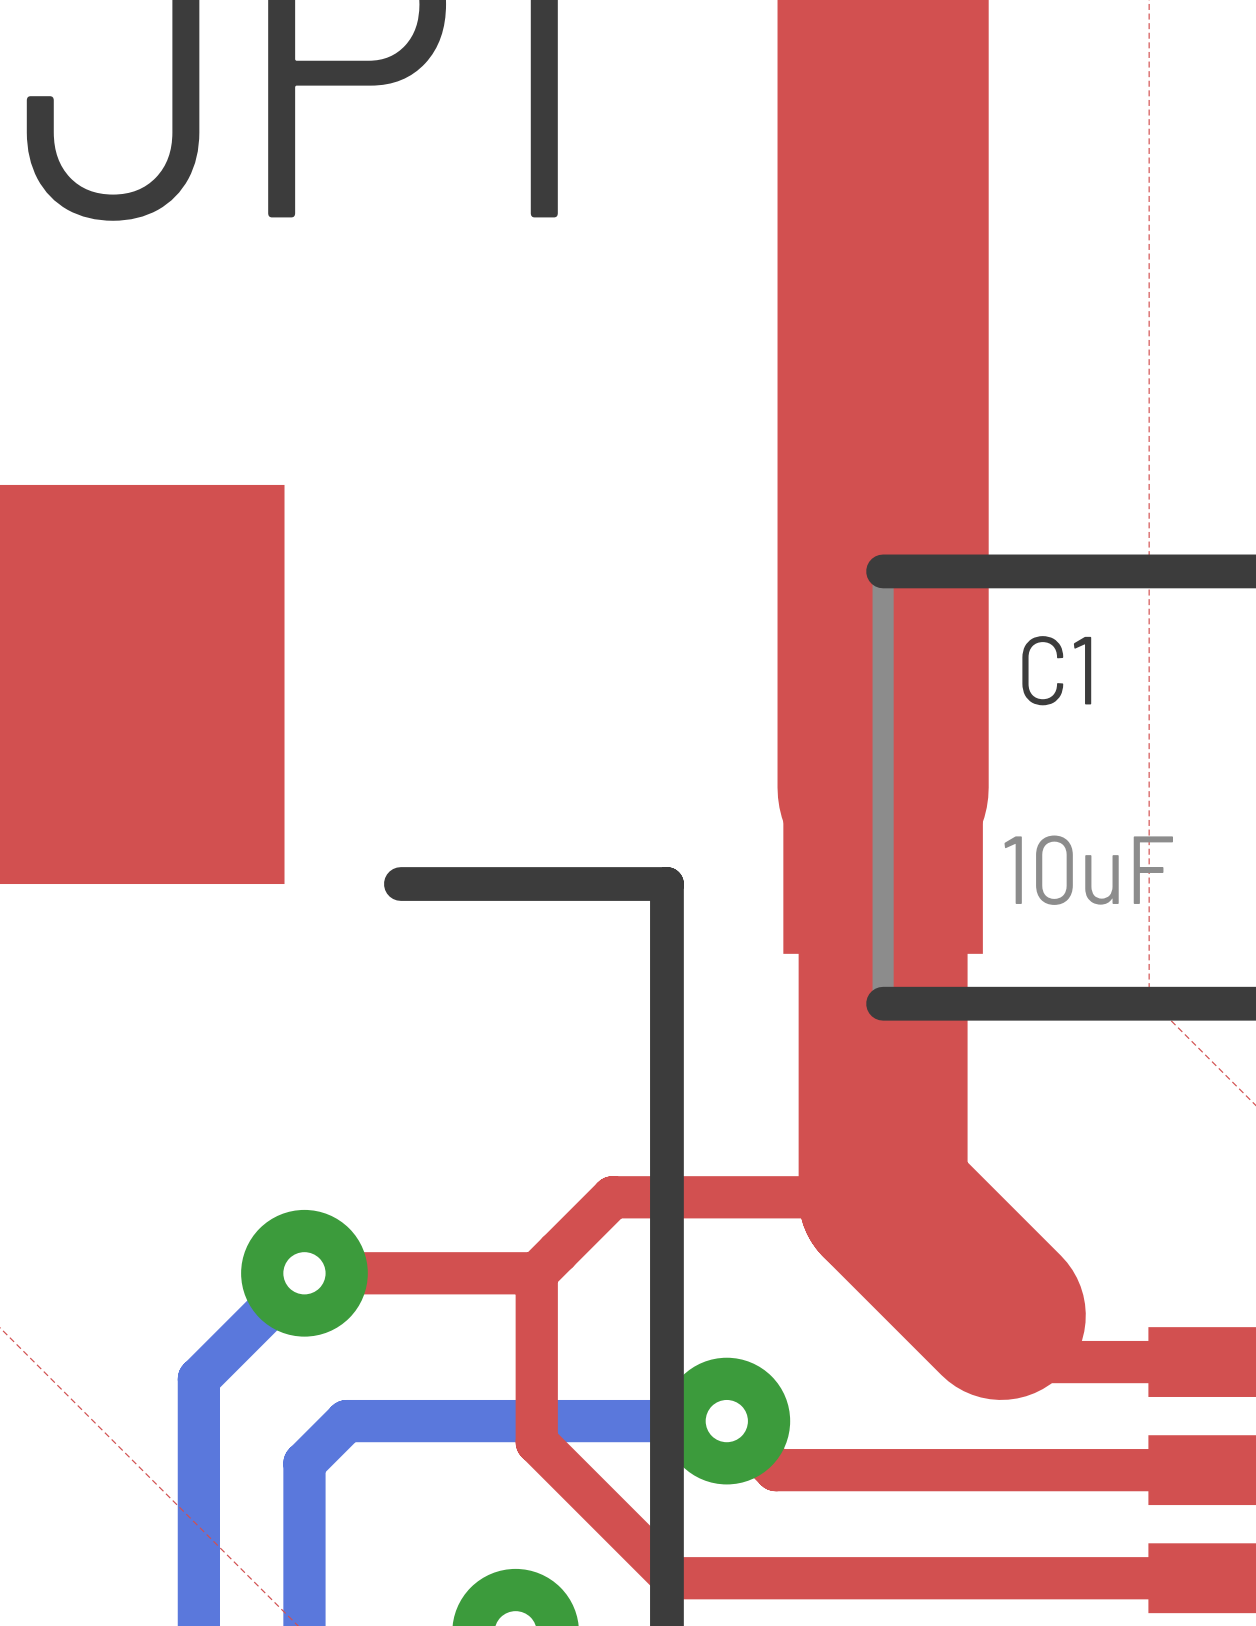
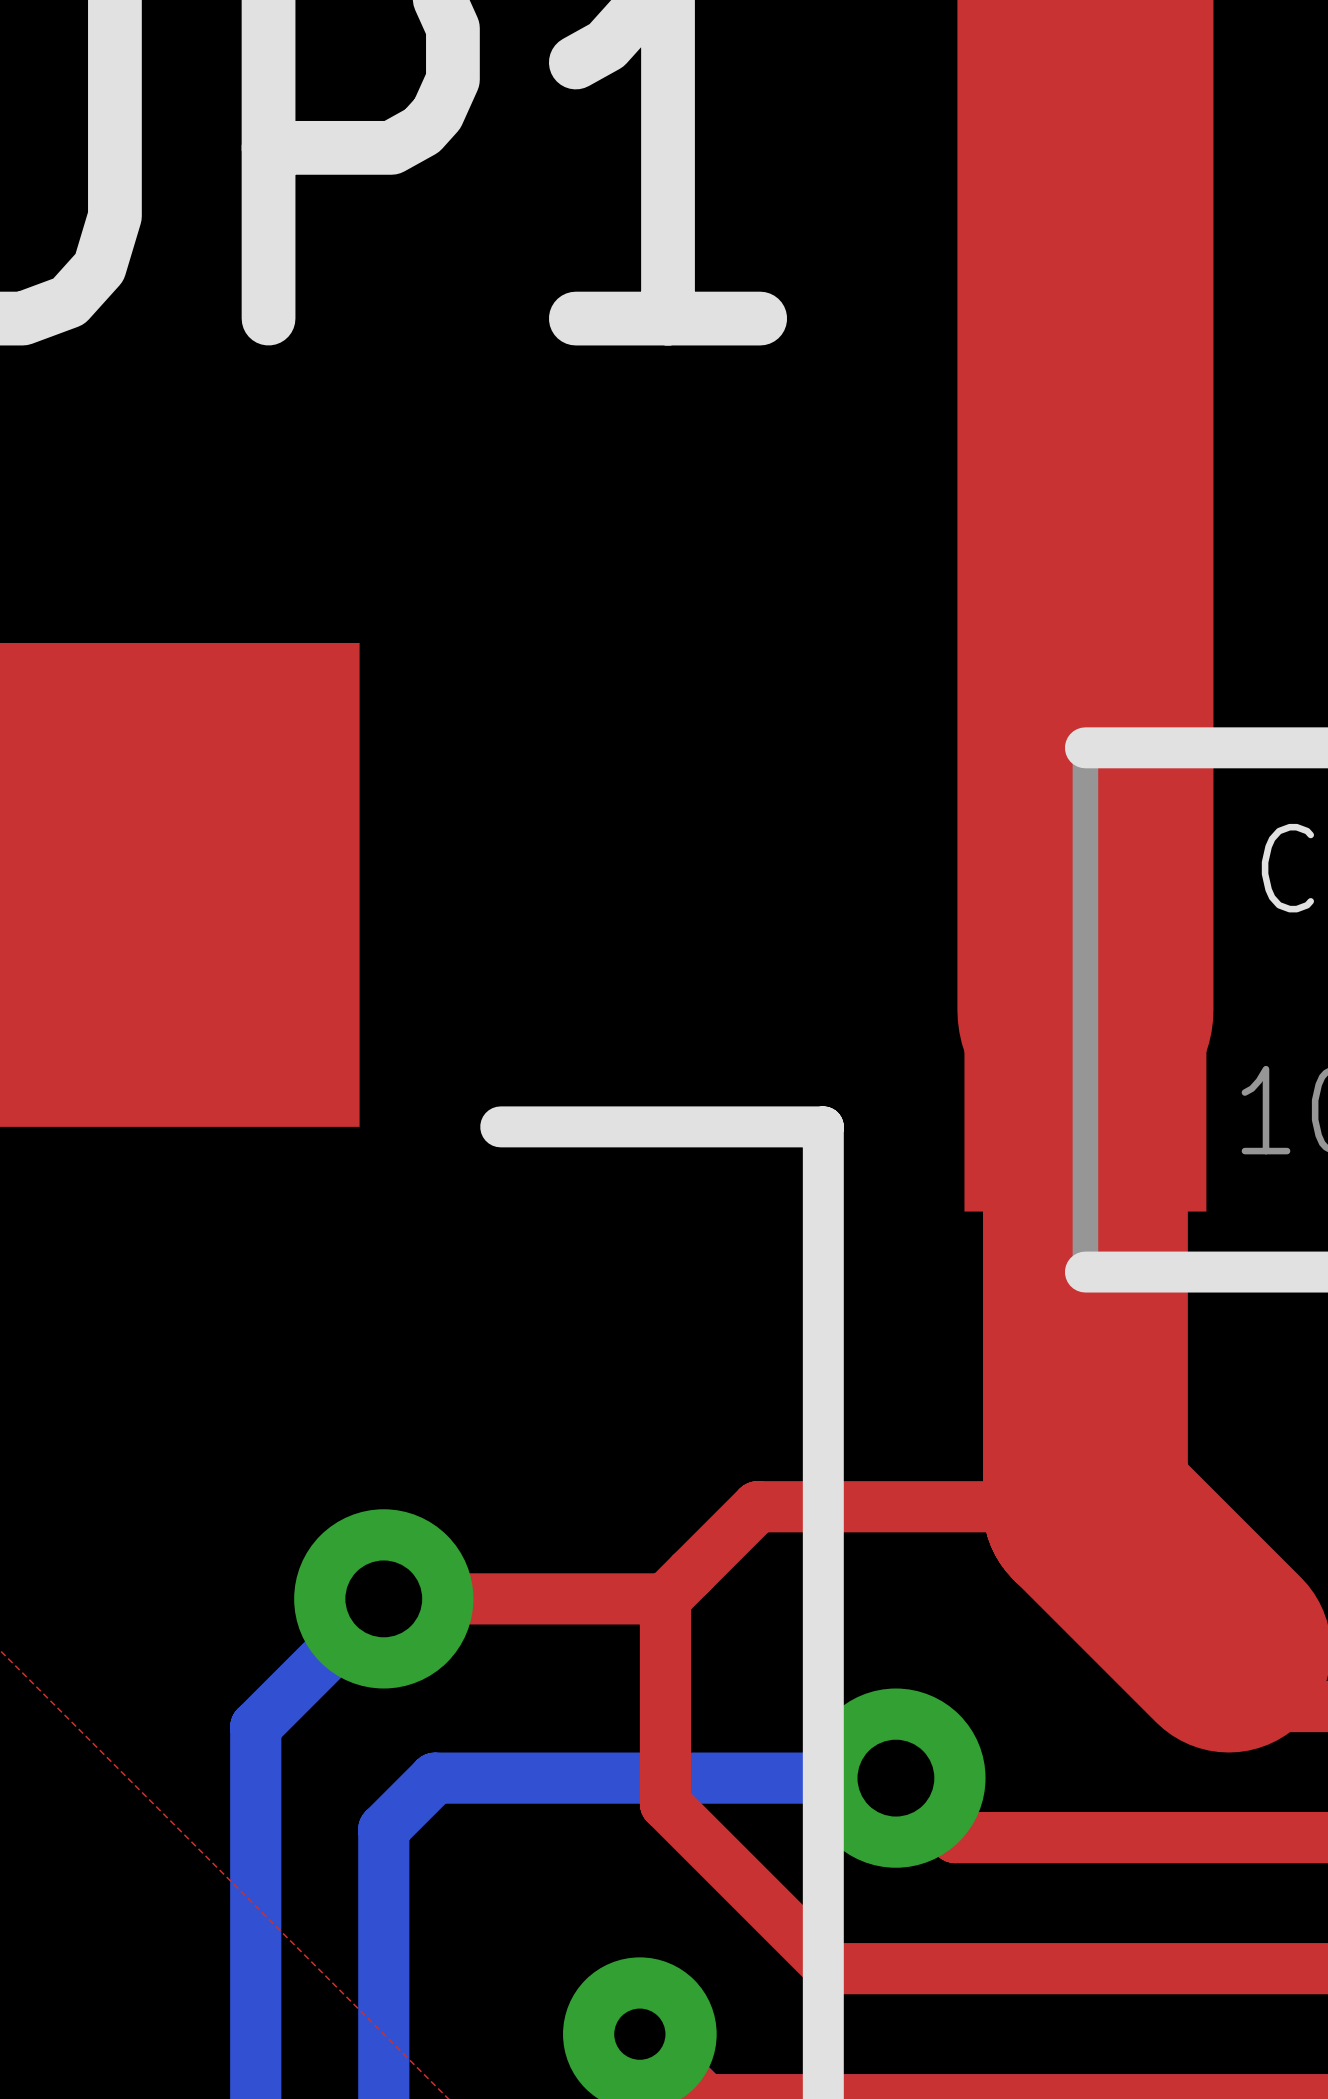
via size: [241, 1209, 368, 1337] -> [294, 1509, 474, 1689]
via size: [663, 1357, 791, 1485] -> [806, 1688, 986, 1868]

